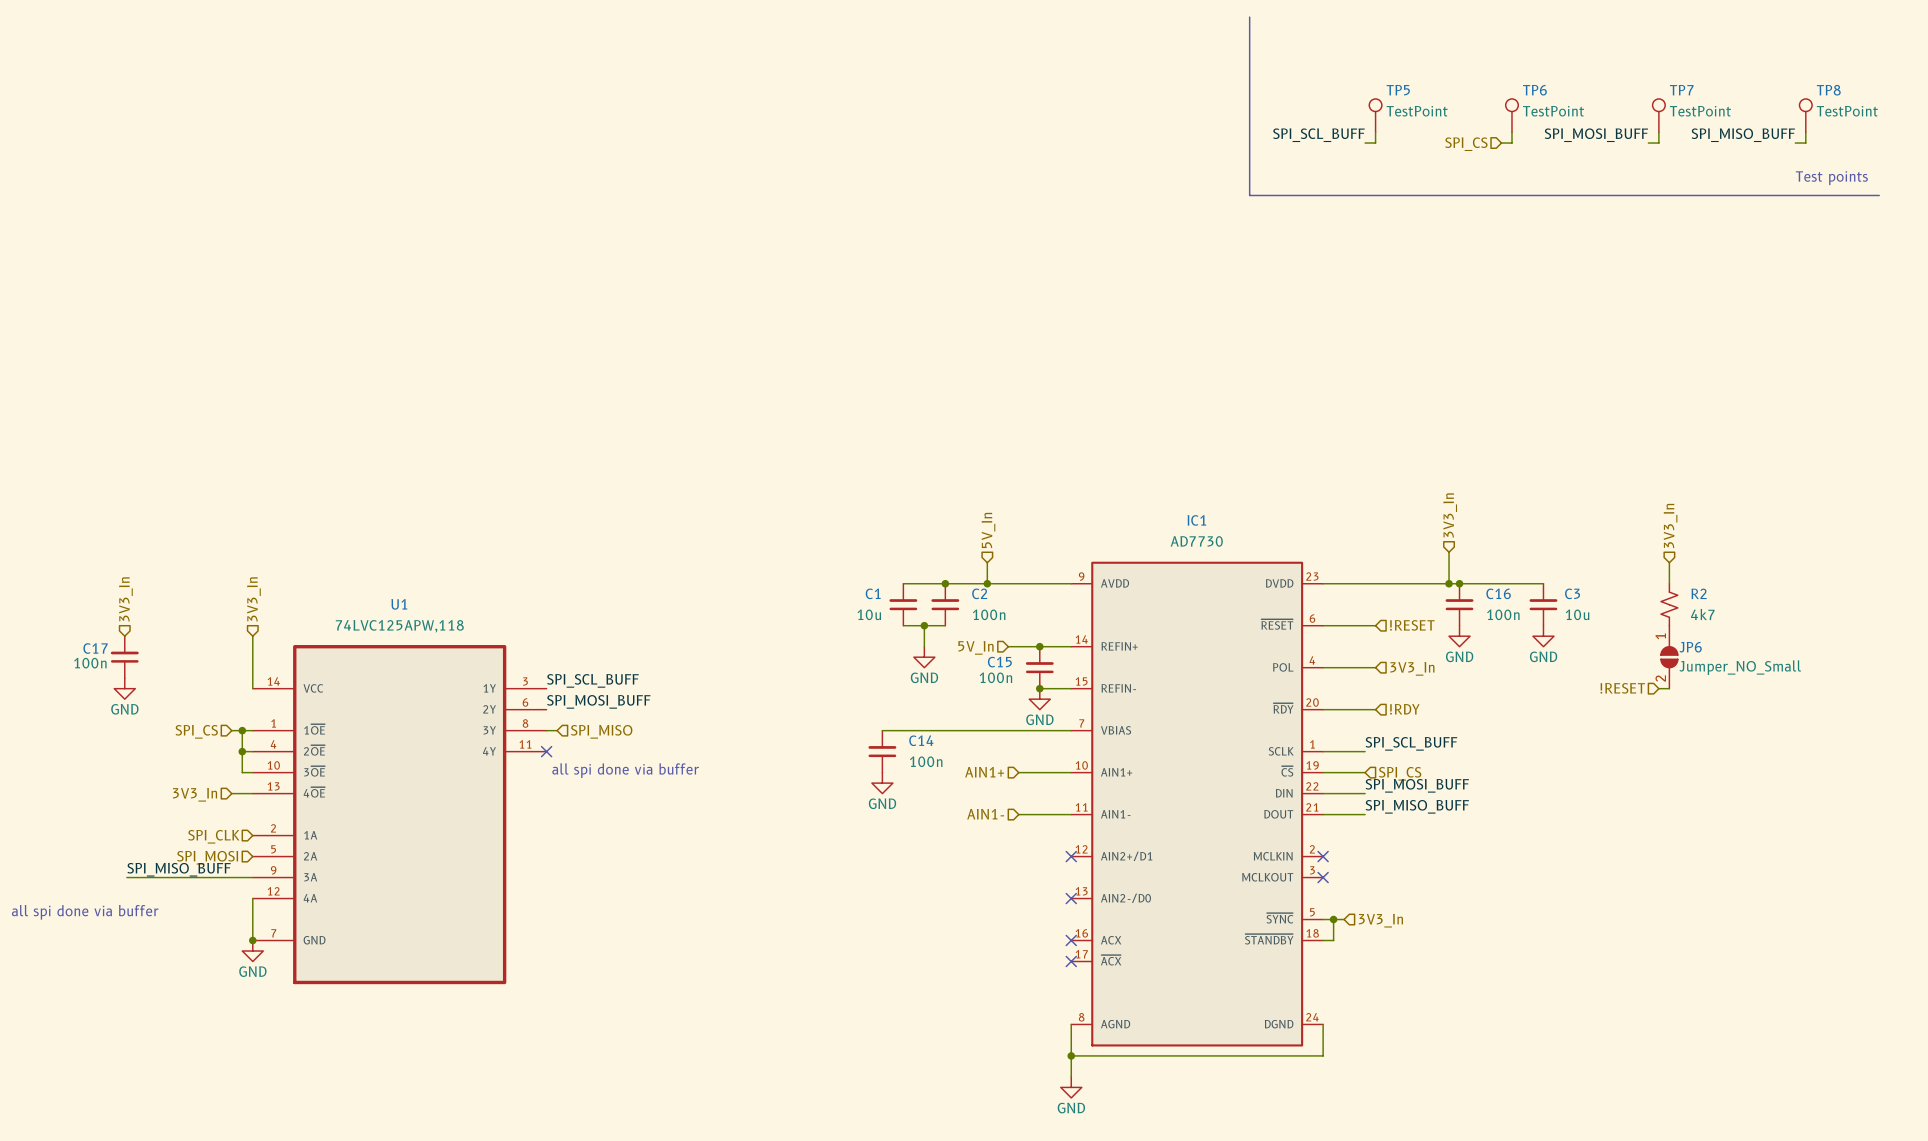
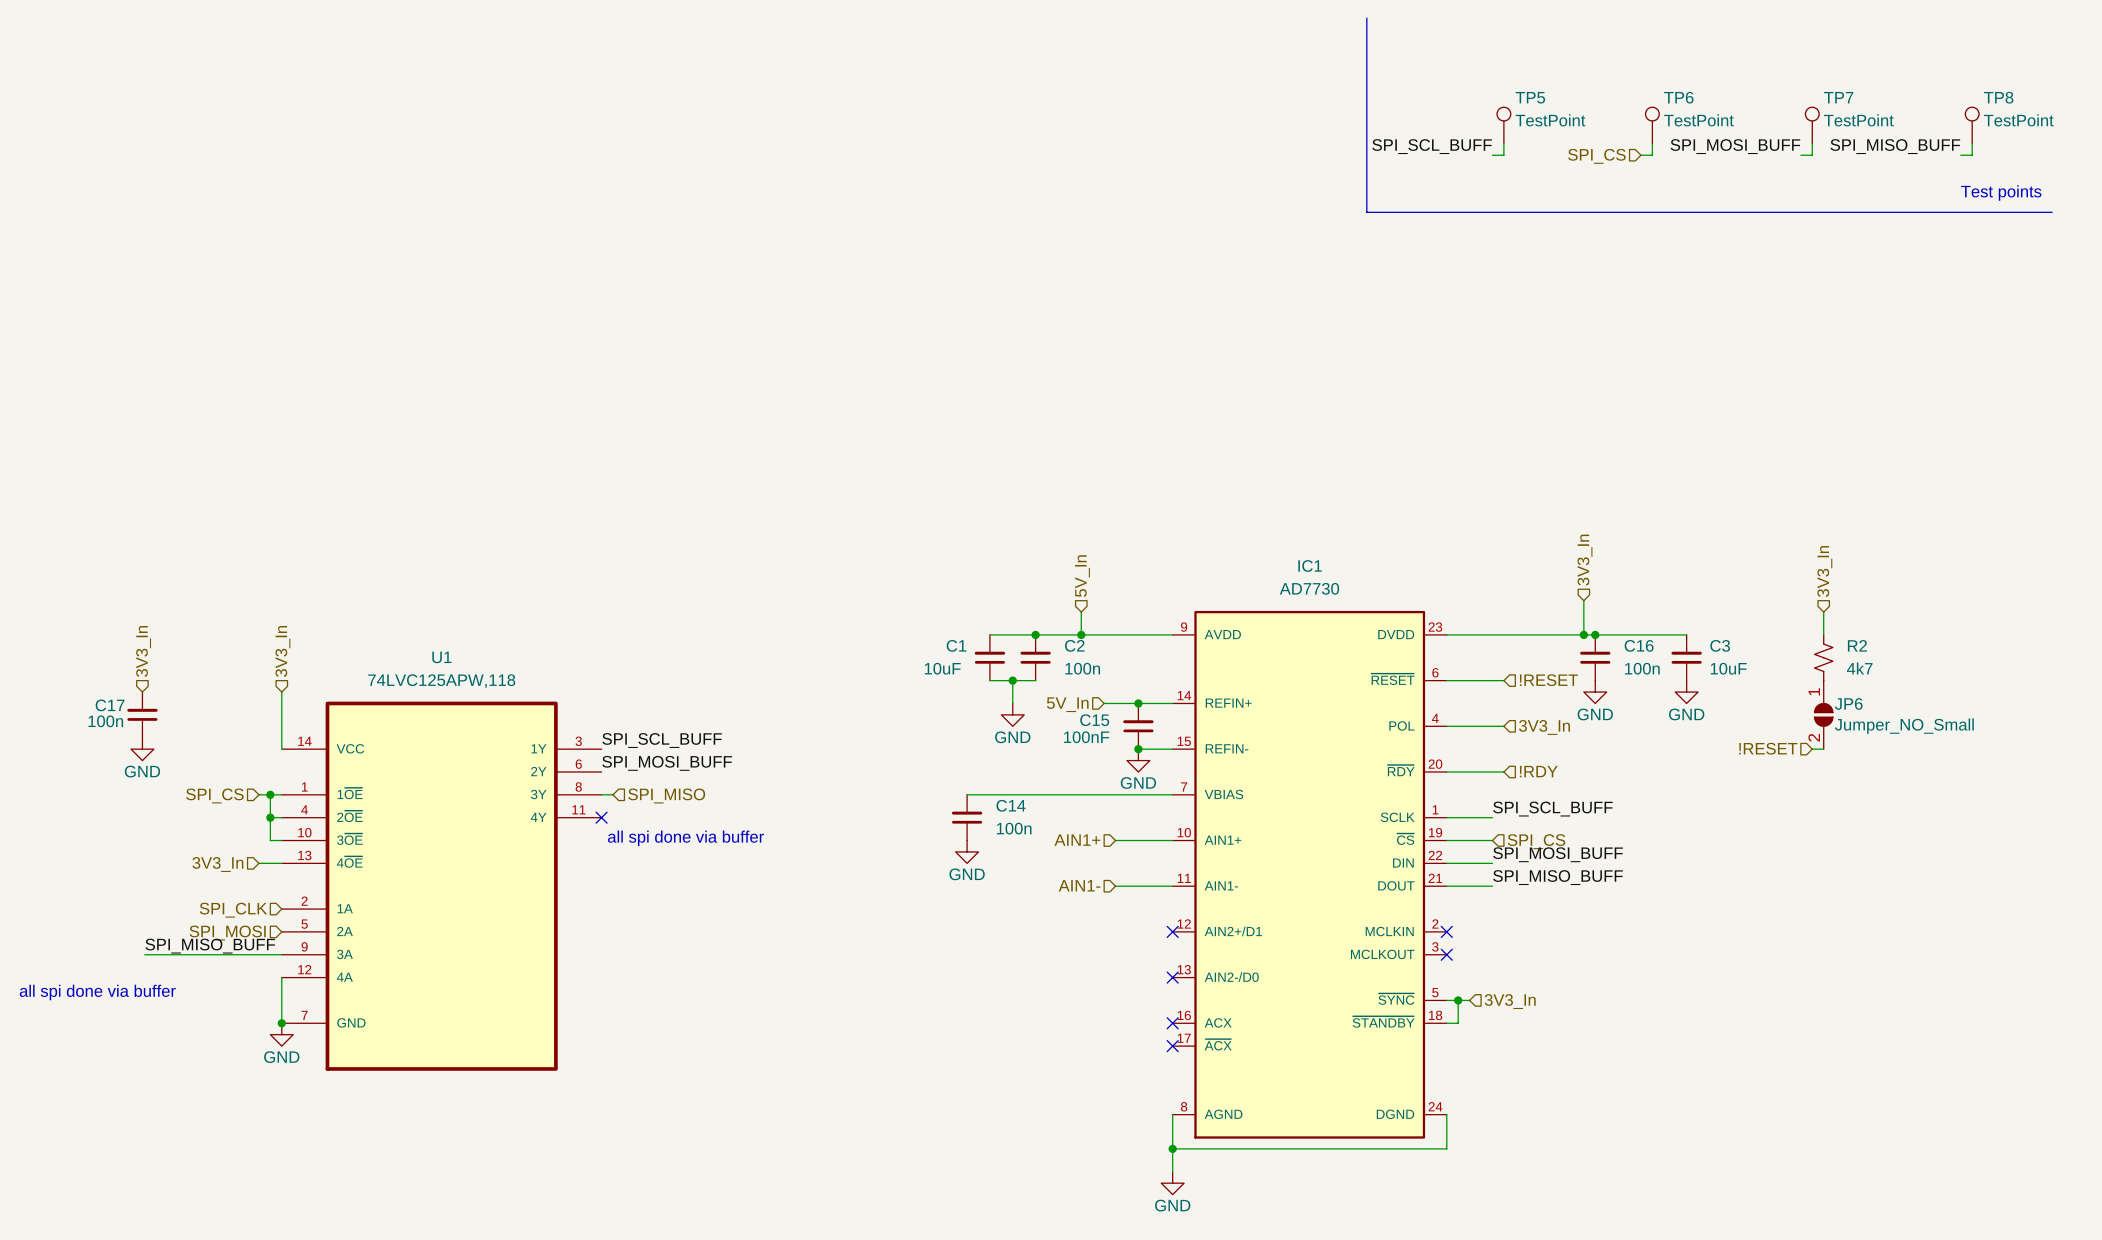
C1 value: 10u (869, 614) -> 10uF (942, 668)
C3 value: 10u (1577, 614) -> 10uF (1728, 668)
C15 value: 100n (995, 677) -> 100nF (1086, 737)

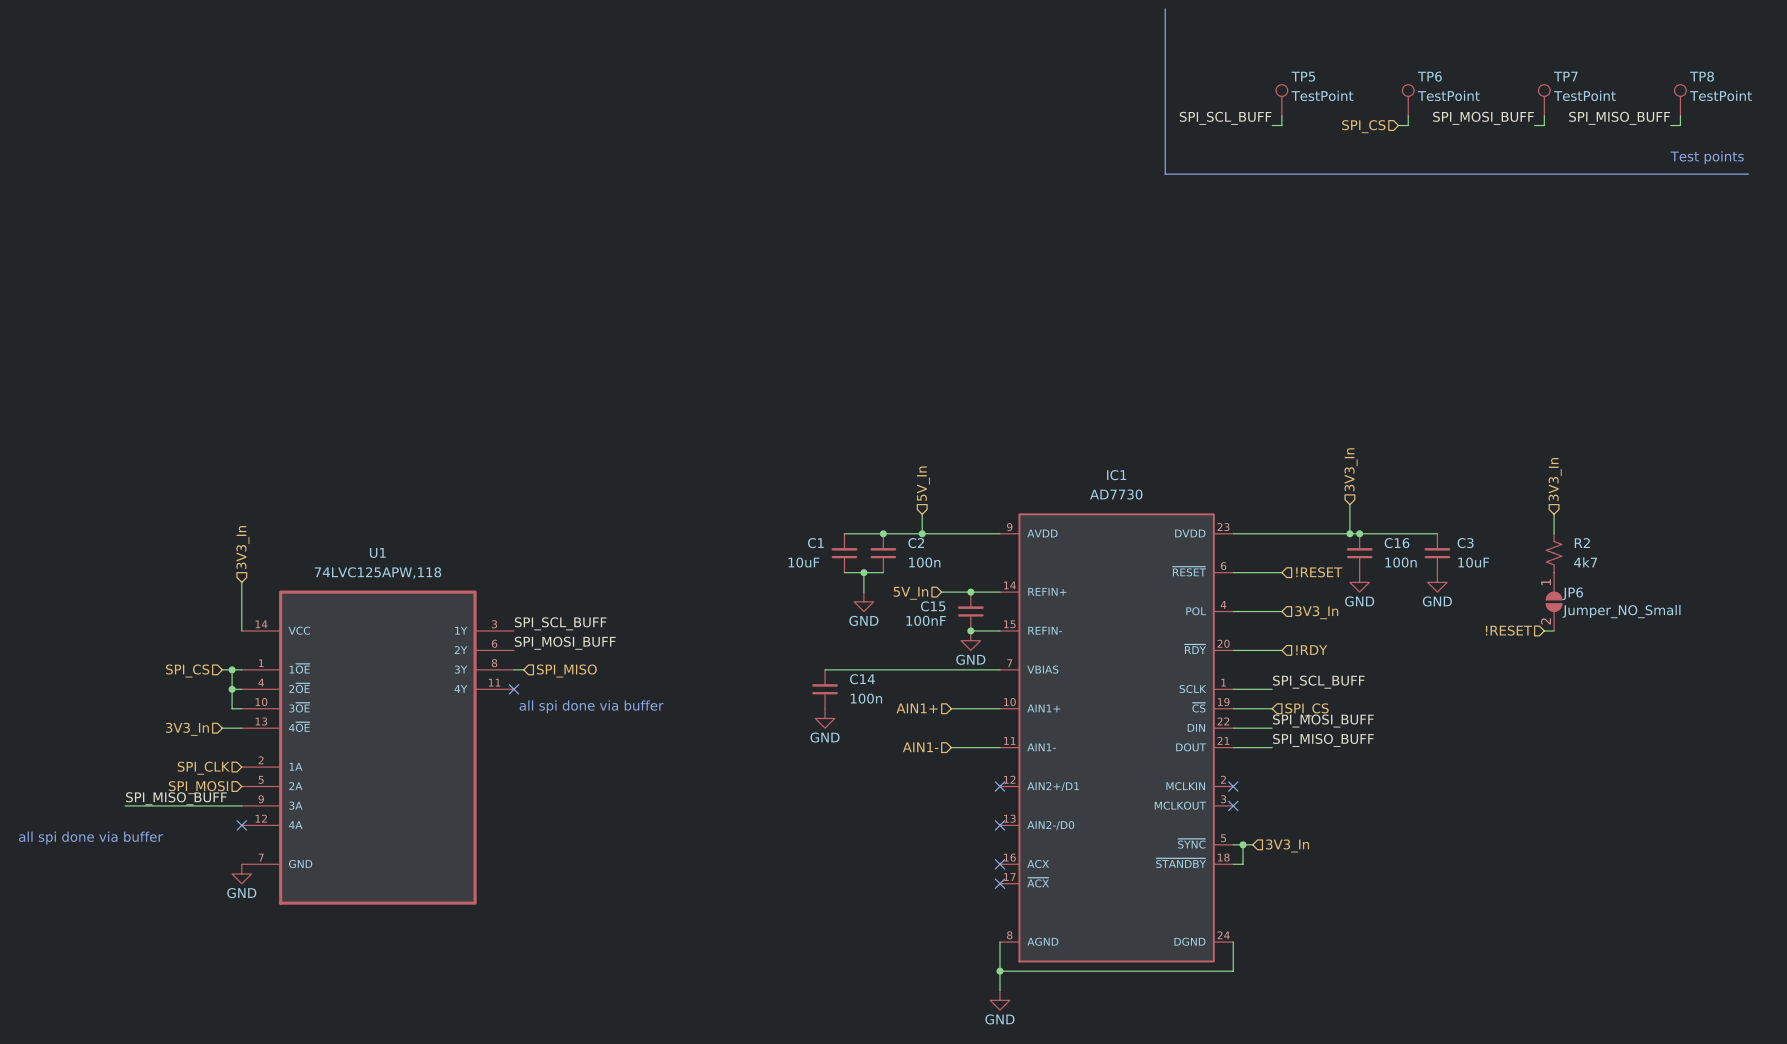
hierarchical label: 3V3_In (143, 651) -> none
C17: 100n (142, 714) -> none
power symbol: GND (142, 749) -> none
wire: (281, 977) (281, 1023) -> none
no-connect mark: none -> (241, 825)
junction: (281, 1023) -> none

